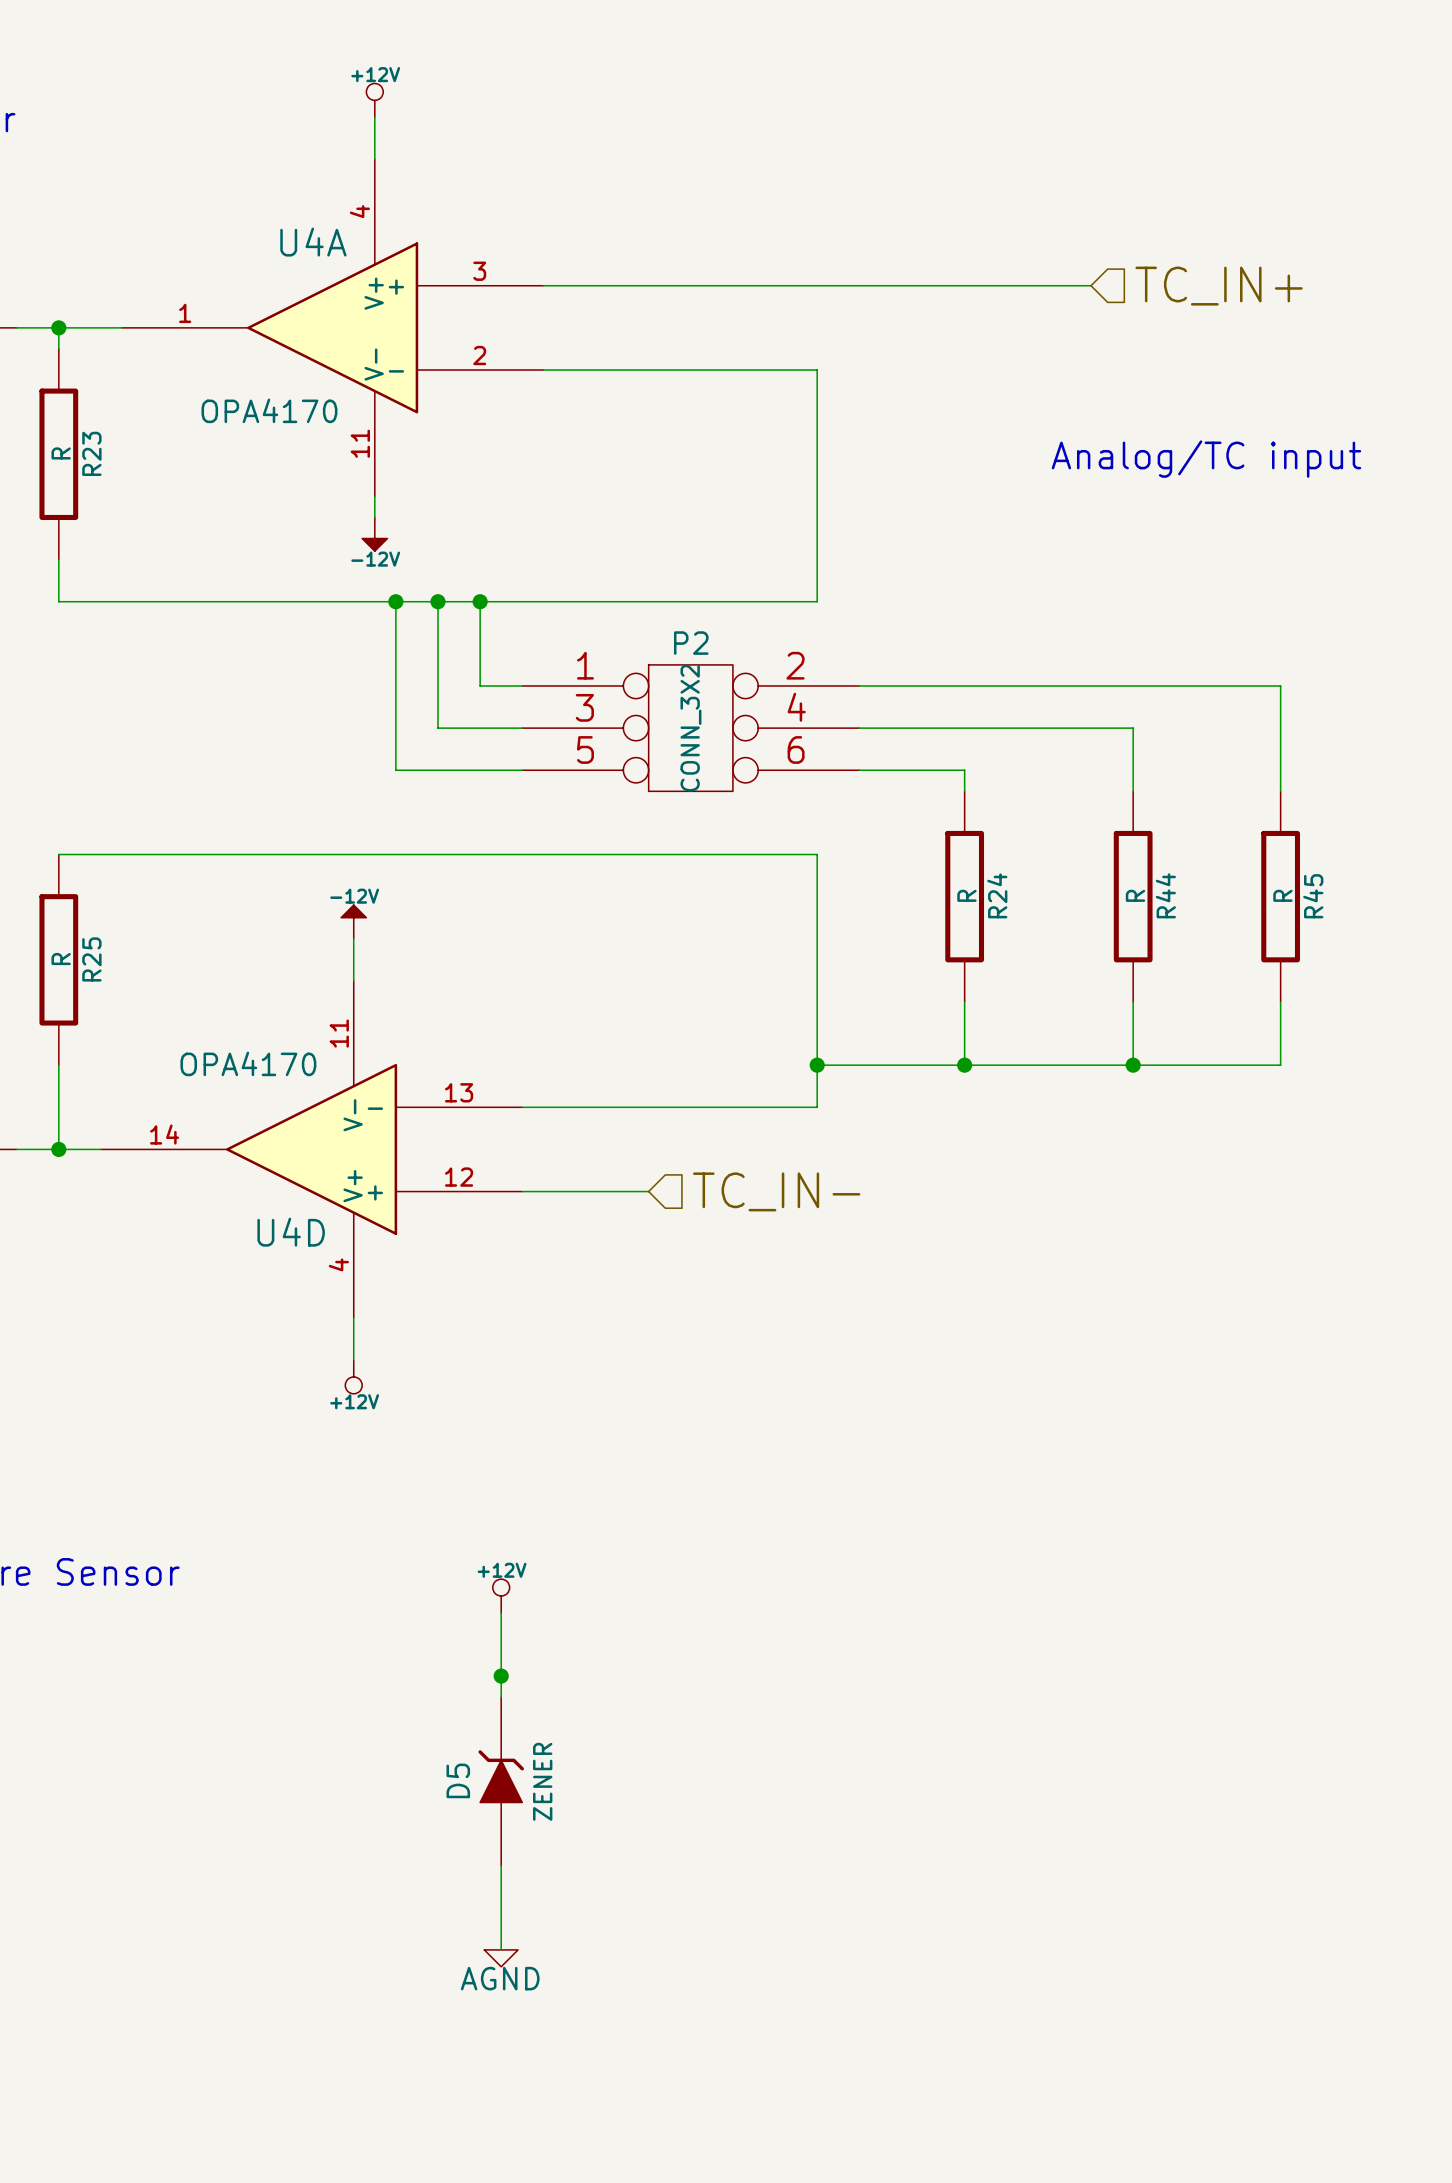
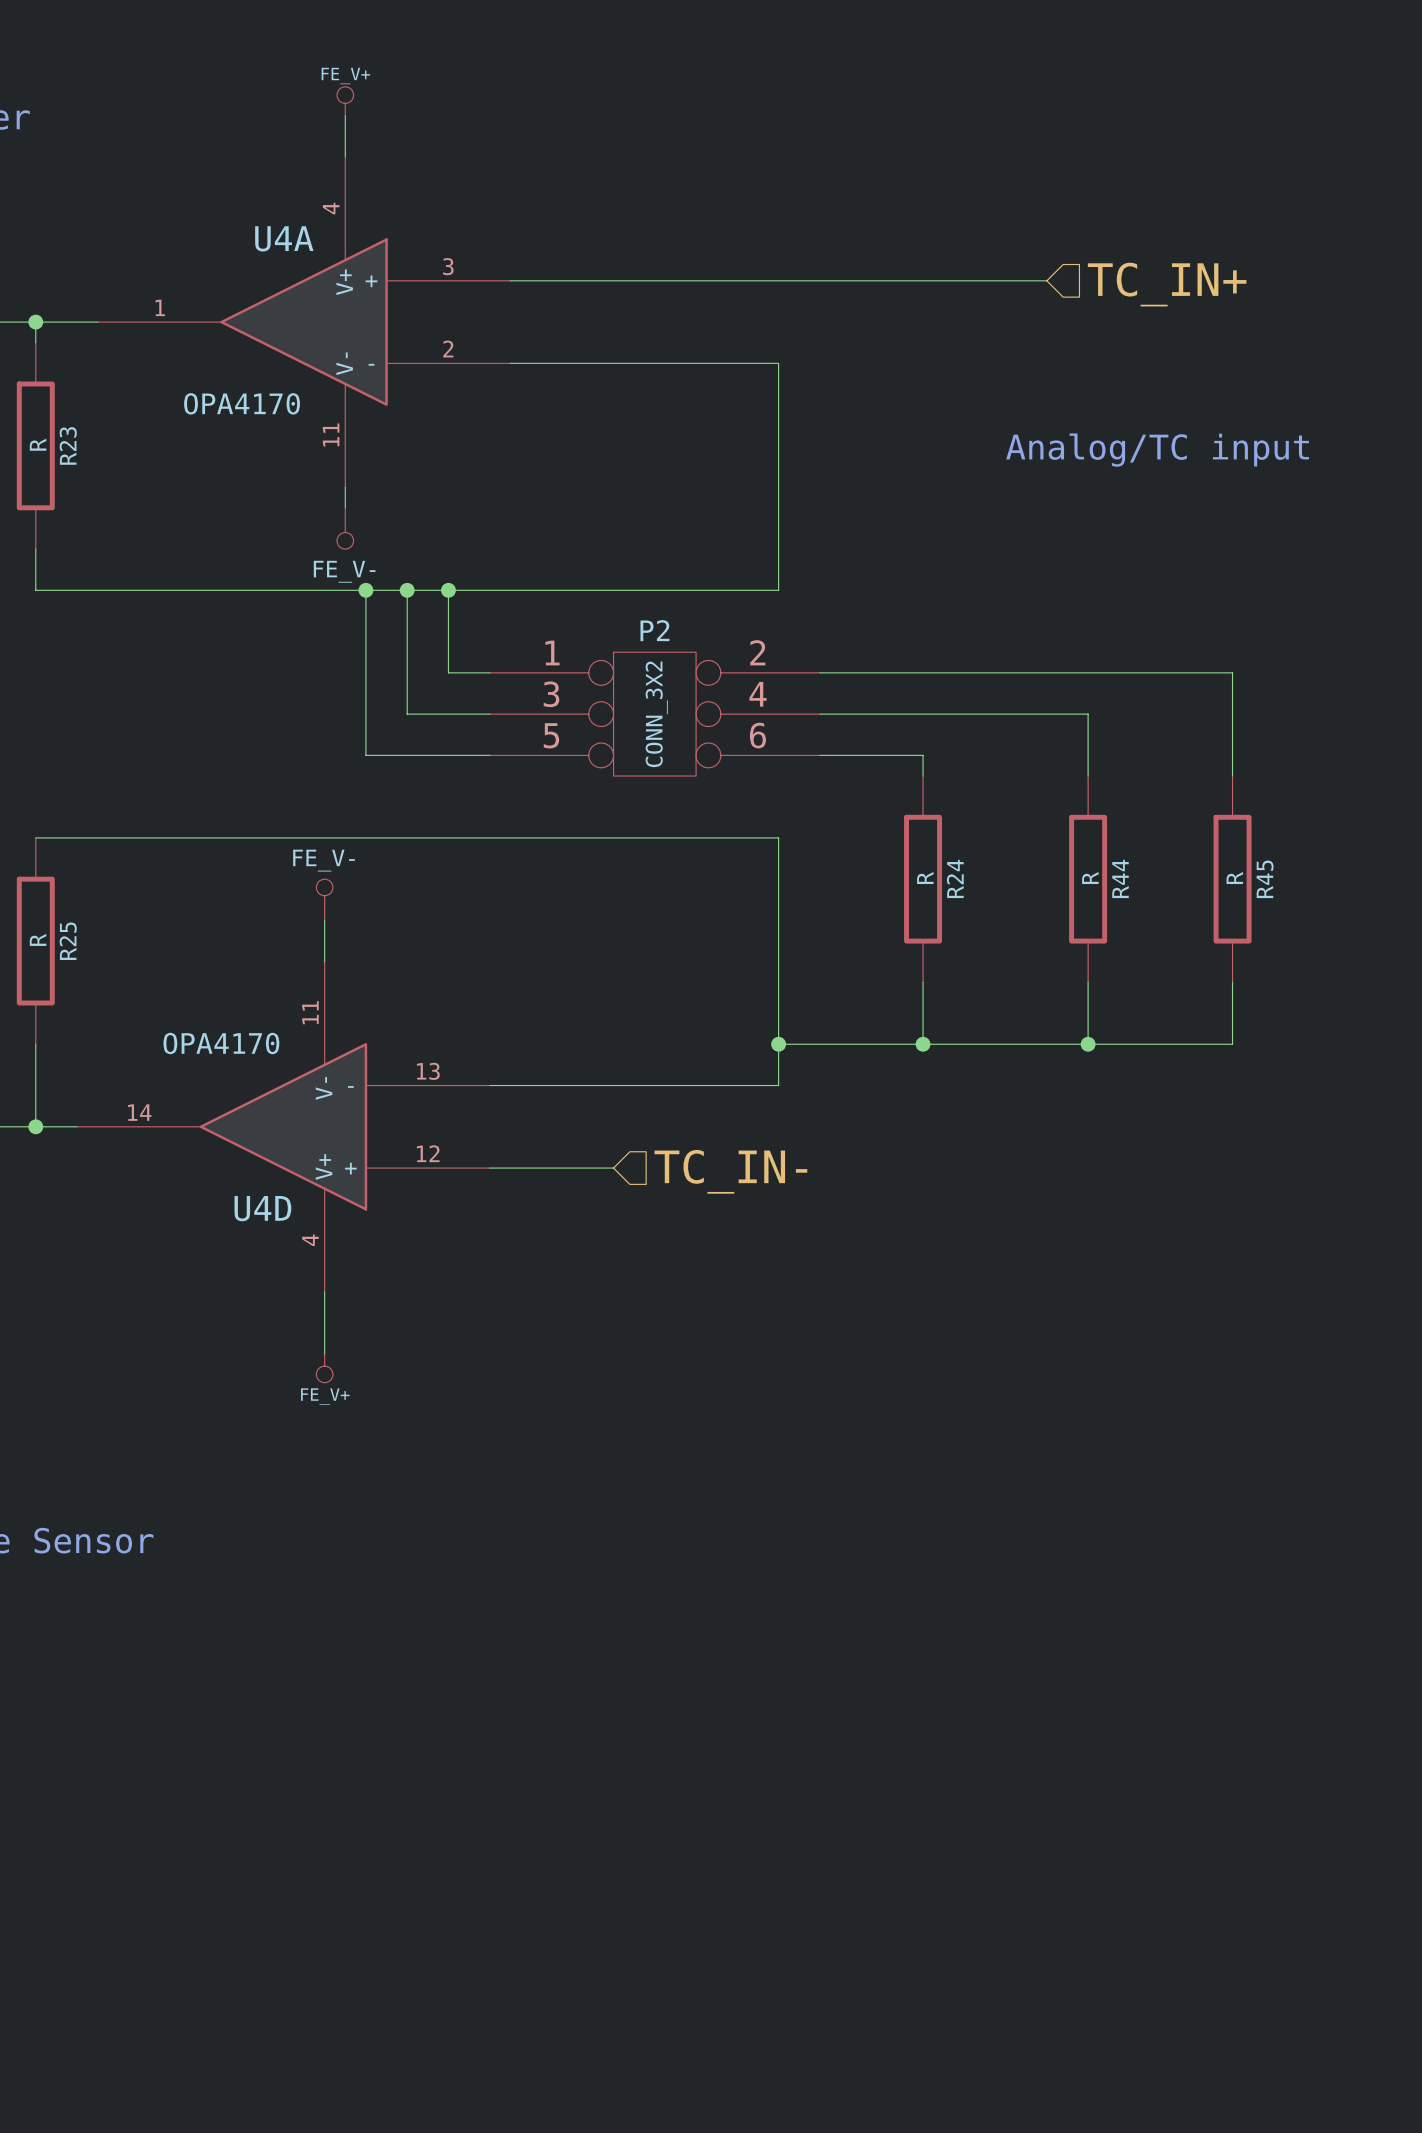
power symbol: +12V (374, 100) -> FE_V+ (345, 101)
power symbol: -12V (374, 534) -> FE_V- (345, 528)
power symbol: -12V (353, 921) -> FE_V- (324, 899)
power symbol: +12V (353, 1376) -> none
power symbol: none -> FE_V+ (324, 1368)
power symbol: +12V (501, 1596) -> none
wire: (501, 1612) (501, 1697) -> none
junction: (501, 1676) -> none
D5: ZENER (501, 1781) -> none
wire: (501, 1865) (501, 1949) -> none
power symbol: AGND (501, 1958) -> none

